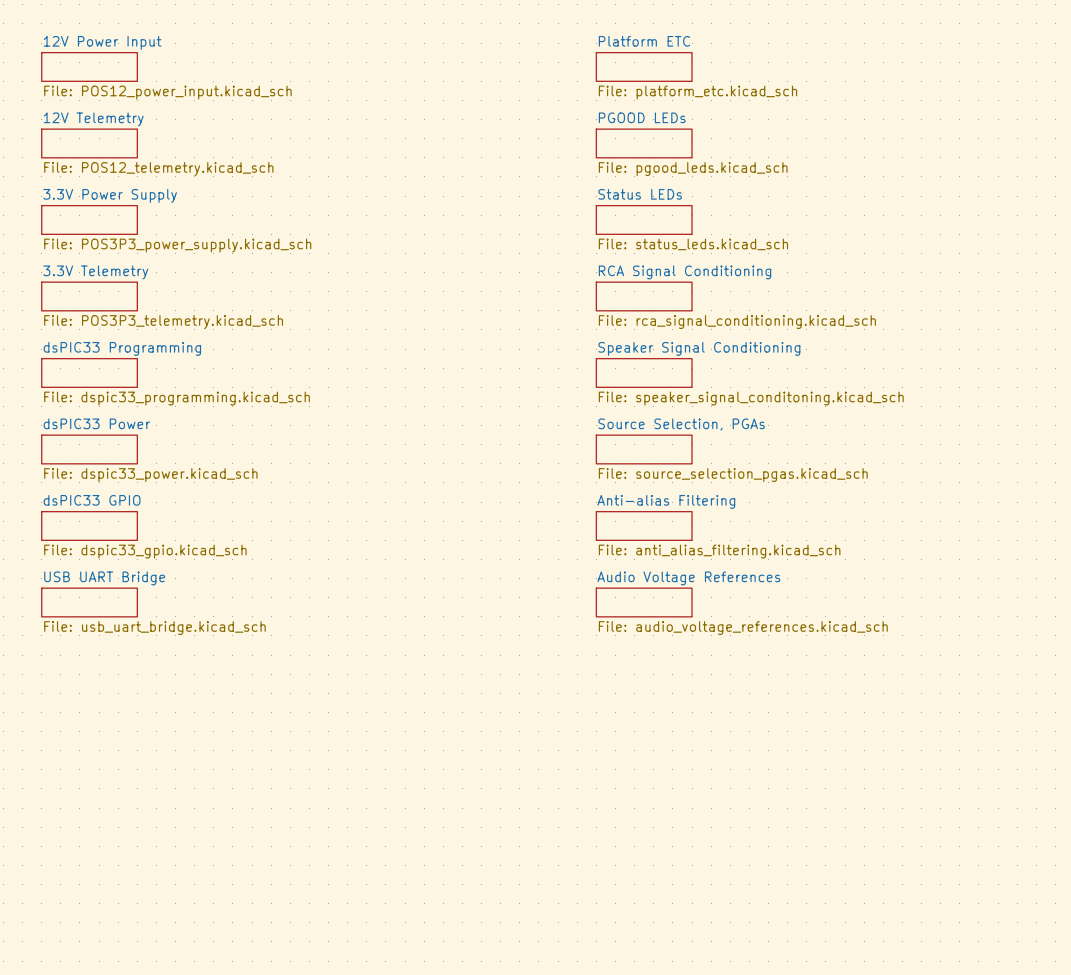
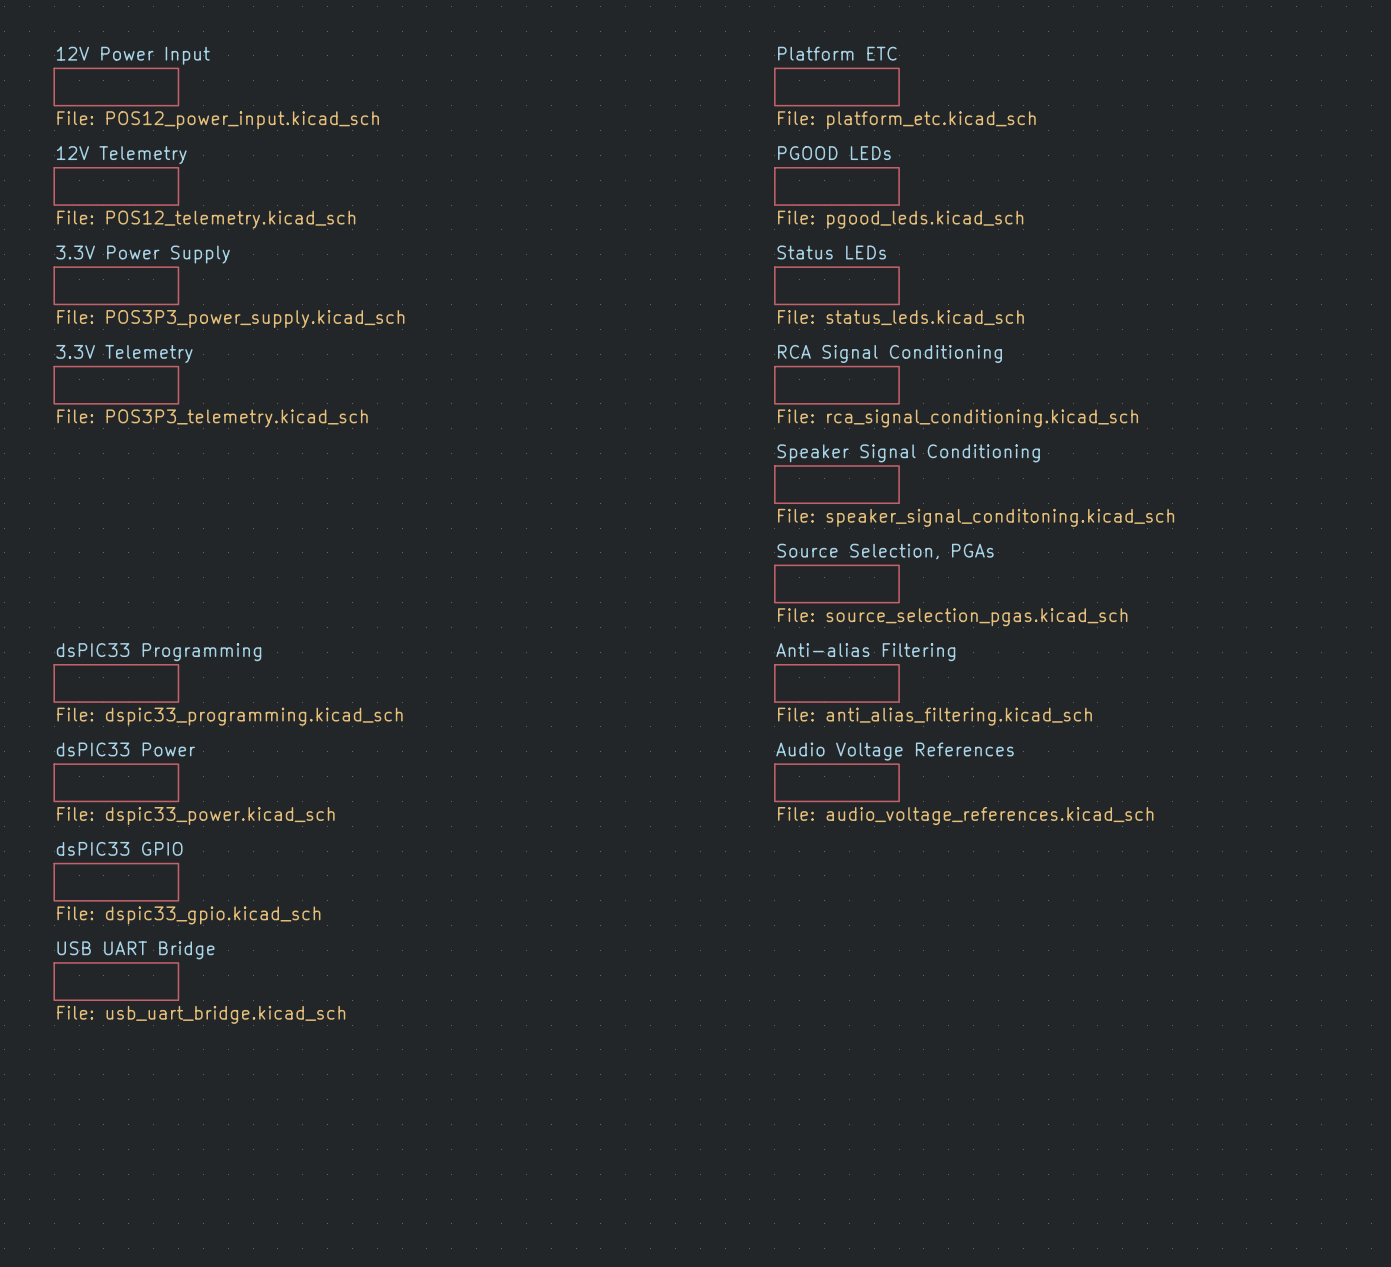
sheet dsPIC33 Programming: File: dspic33_programming.kicad_sch (89, 372) -> none
sheet dsPIC33 Power: File: dspic33_power.kicad_sch (89, 449) -> none
sheet dsPIC33 GPIO name: dsPIC33 GPIO (92, 500) -> dsPIC33 Programming (159, 652)
sheet dsPIC33 GPIO value: File: dspic33_gpio.kicad_sch (145, 551) -> File: dspic33_programming.kicad_sch (230, 716)
sheet USB UART Bridge name: USB UART Bridge (104, 578) -> dsPIC33 Power (125, 749)
sheet USB UART Bridge value: File: usb_uart_bridge.kicad_sch (154, 628) -> File: dspic33_power.kicad_sch (196, 816)
sheet dsPIC33 GPIO: none -> File: dspic33_gpio.kicad_sch (116, 882)
sheet USB UART Bridge: none -> File: usb_uart_bridge.kicad_sch (116, 981)

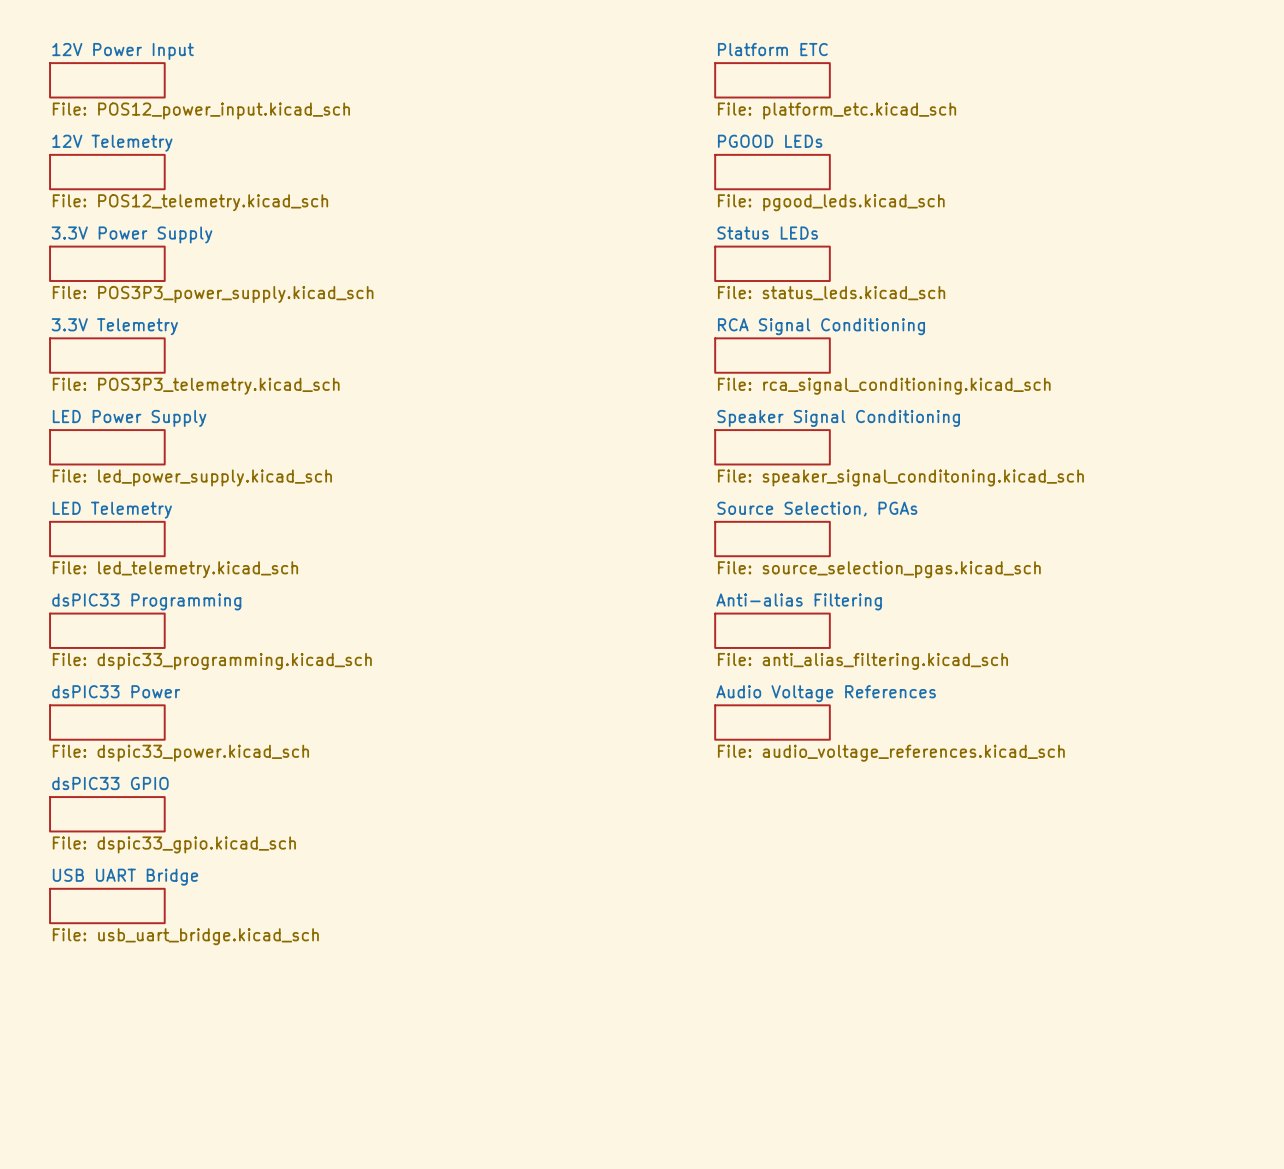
sheet LED Power Supply: none -> File: led_power_supply.kicad_sch (107, 447)
sheet LED Telemetry: none -> File: led_telemetry.kicad_sch (107, 539)

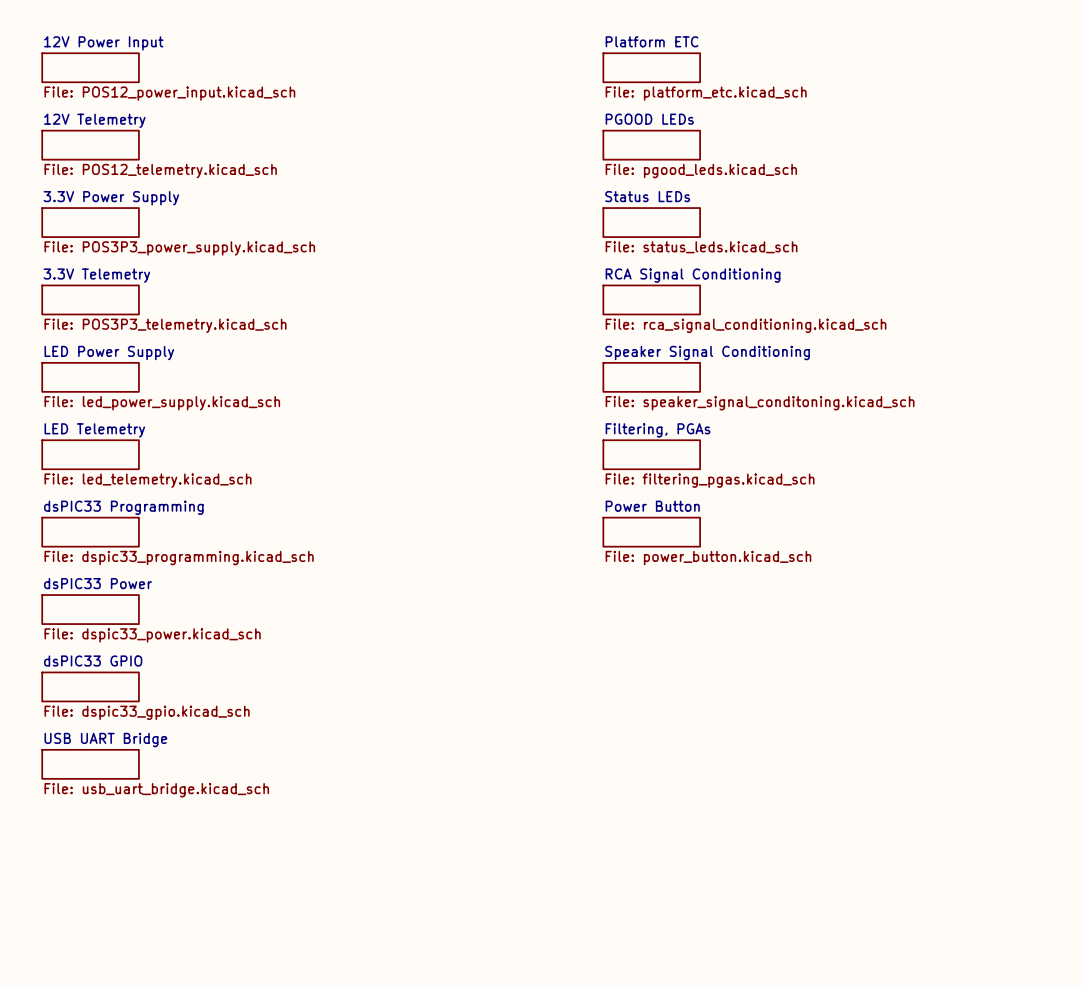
sheet Source Selection, PGAs name: Source Selection, PGAs (817, 509) -> Filtering, PGAs (658, 430)
sheet Source Selection, PGAs value: File: source_selection_pgas.kicad_sch (879, 569) -> File: filtering_pgas.kicad_sch (710, 480)
sheet Anti-alias Filtering name: Anti-alias Filtering (799, 601) -> Power Button (652, 506)
sheet Anti-alias Filtering value: File: anti_alias_filtering.kicad_sch (862, 661) -> File: power_button.kicad_sch (708, 558)
sheet Audio Voltage References: File: audio_voltage_references.kicad_sch (772, 722) -> none

